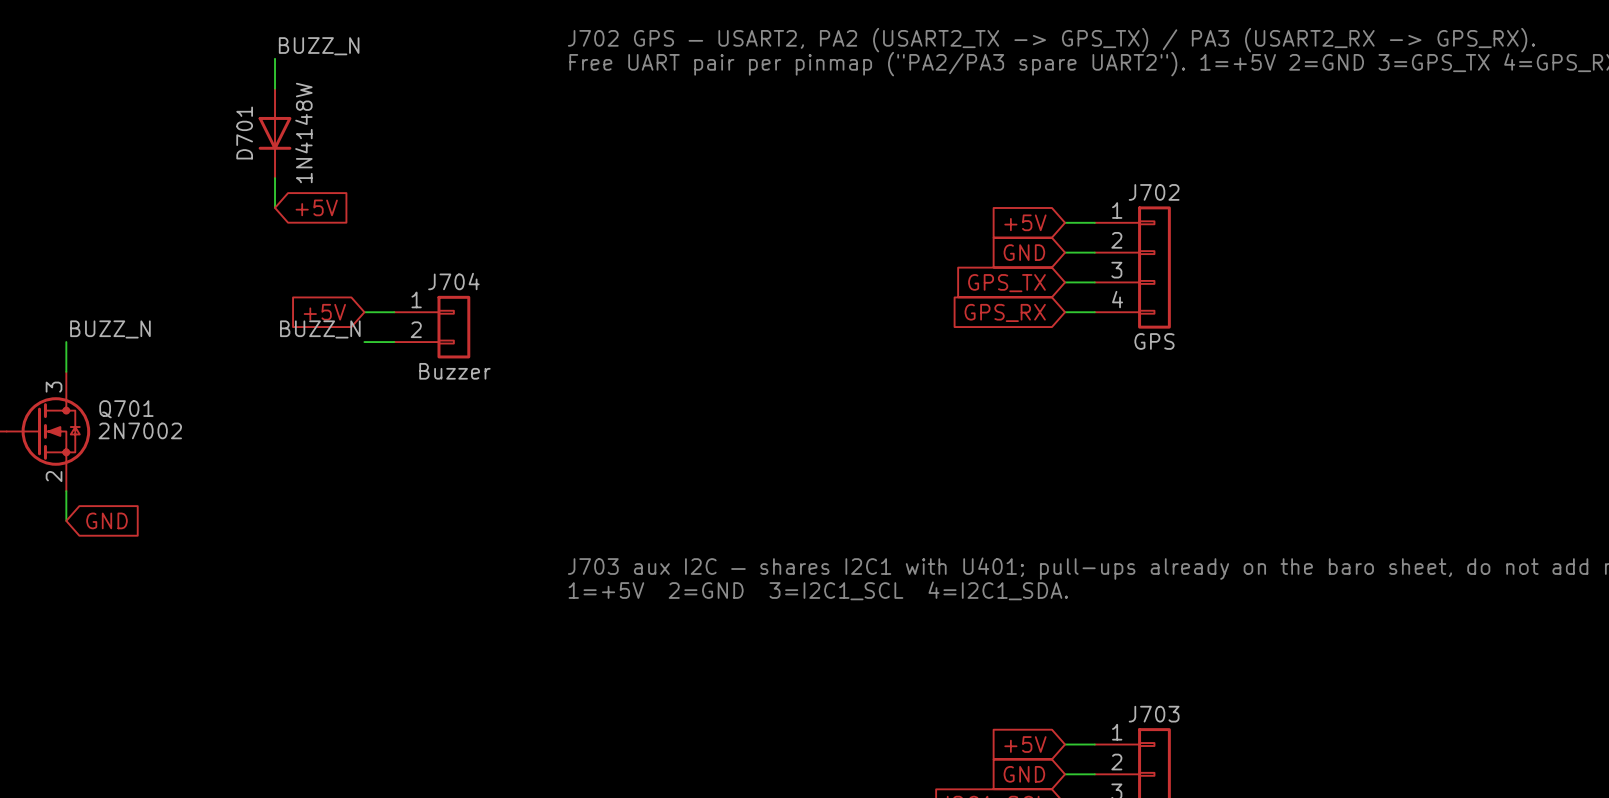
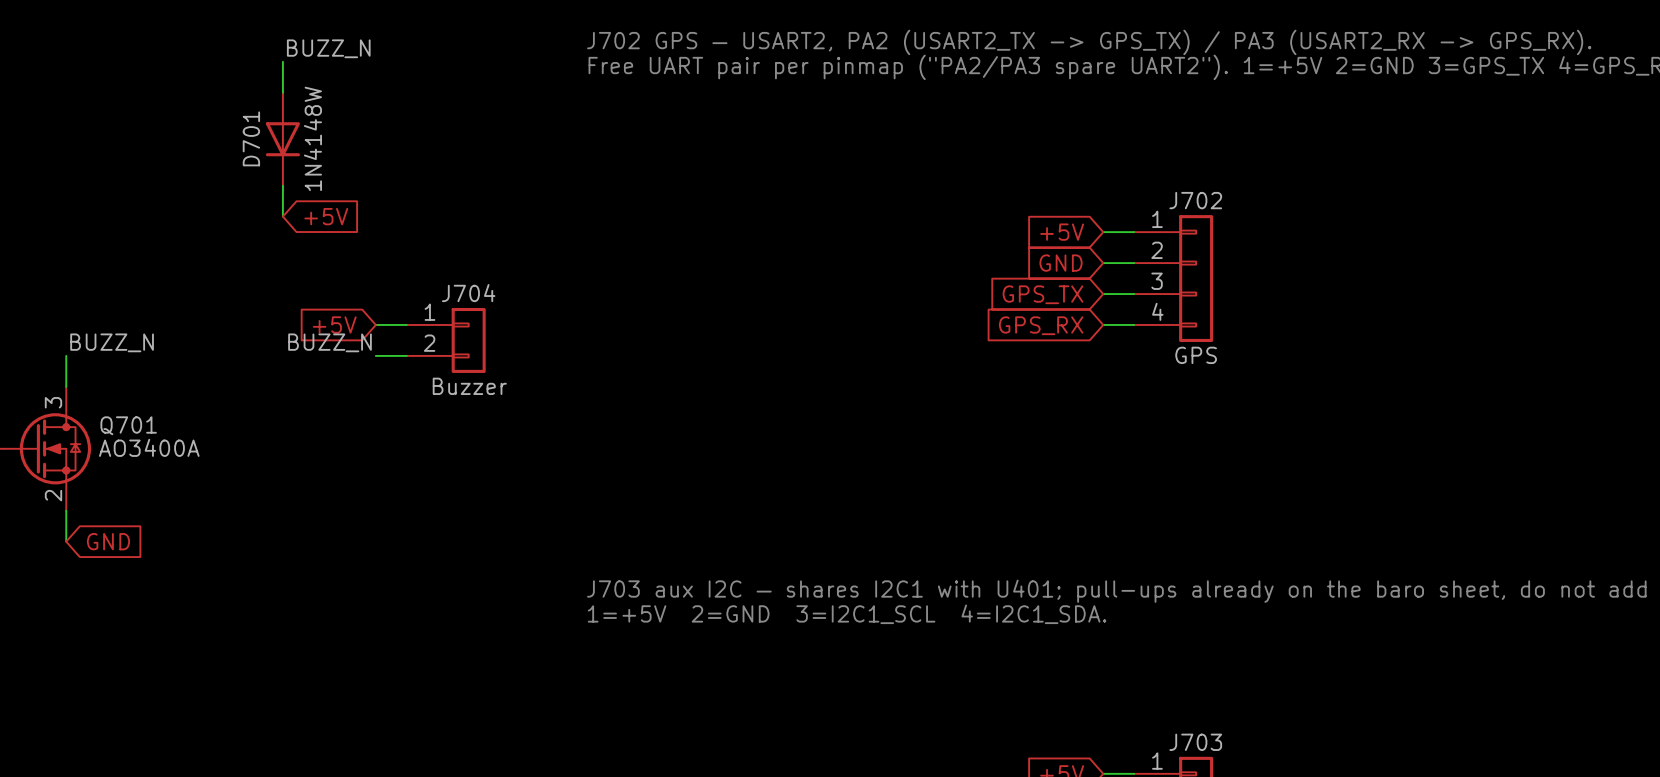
Q701 value: 2N7002 (140, 430) -> AO3400A (149, 447)

